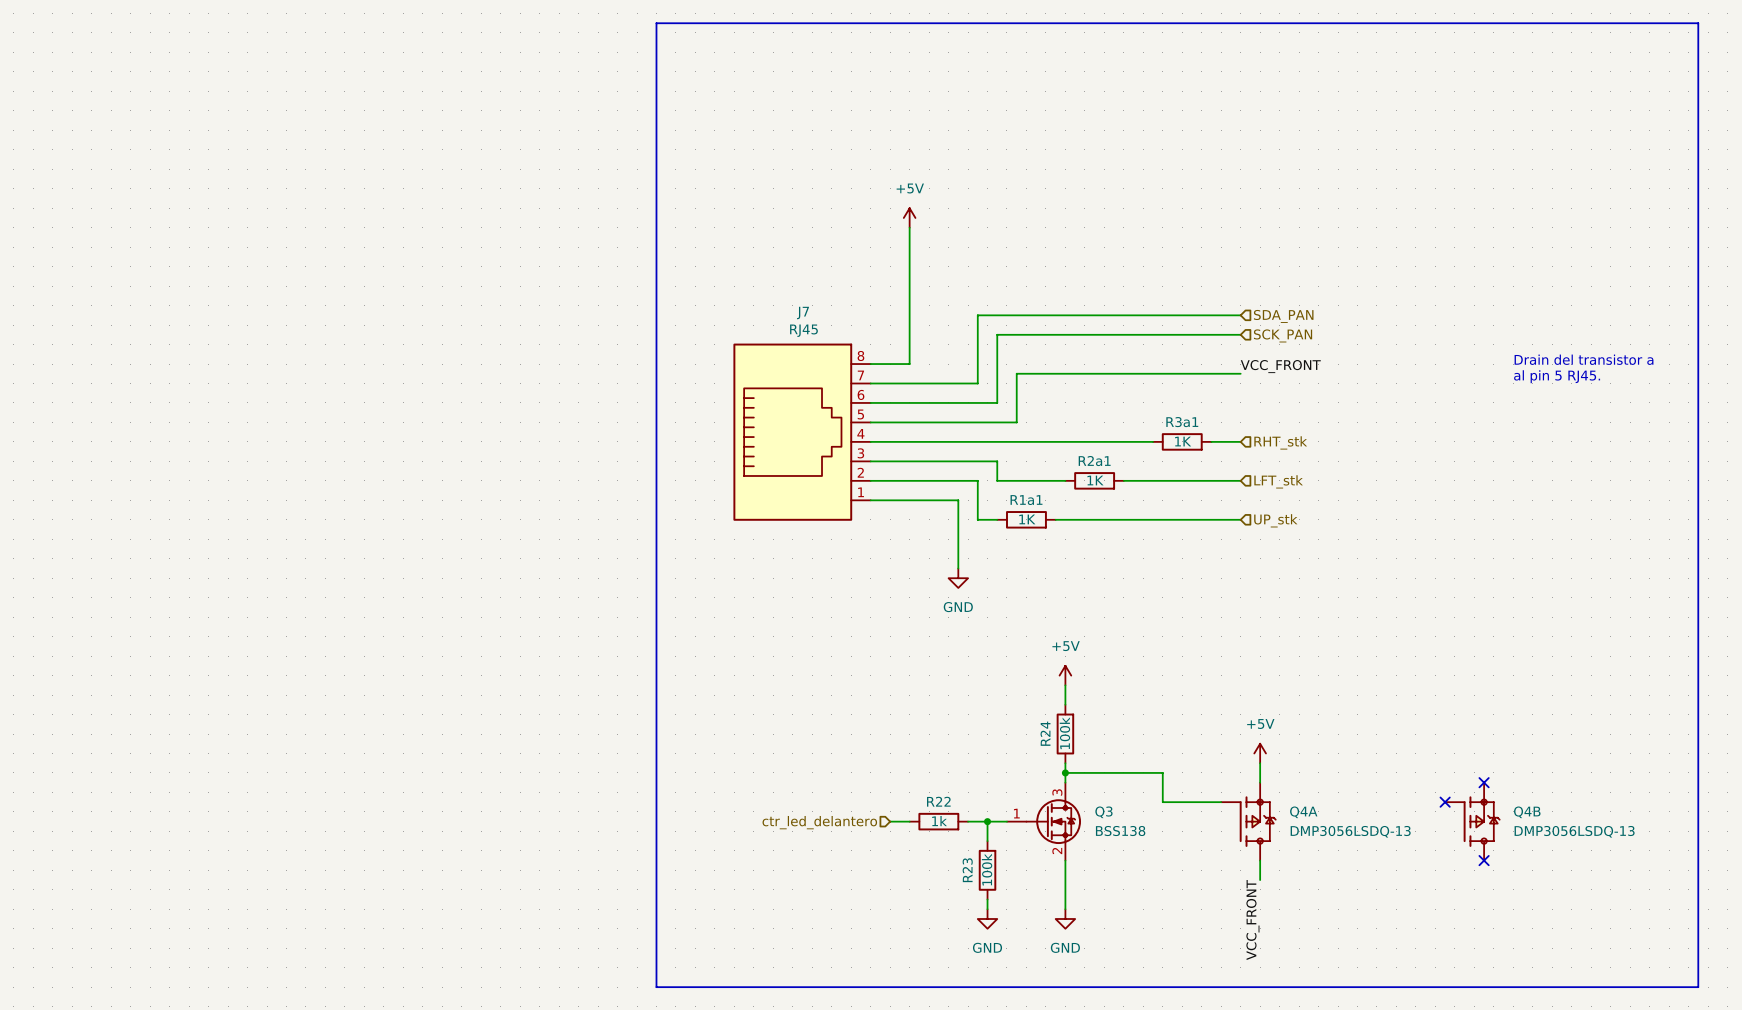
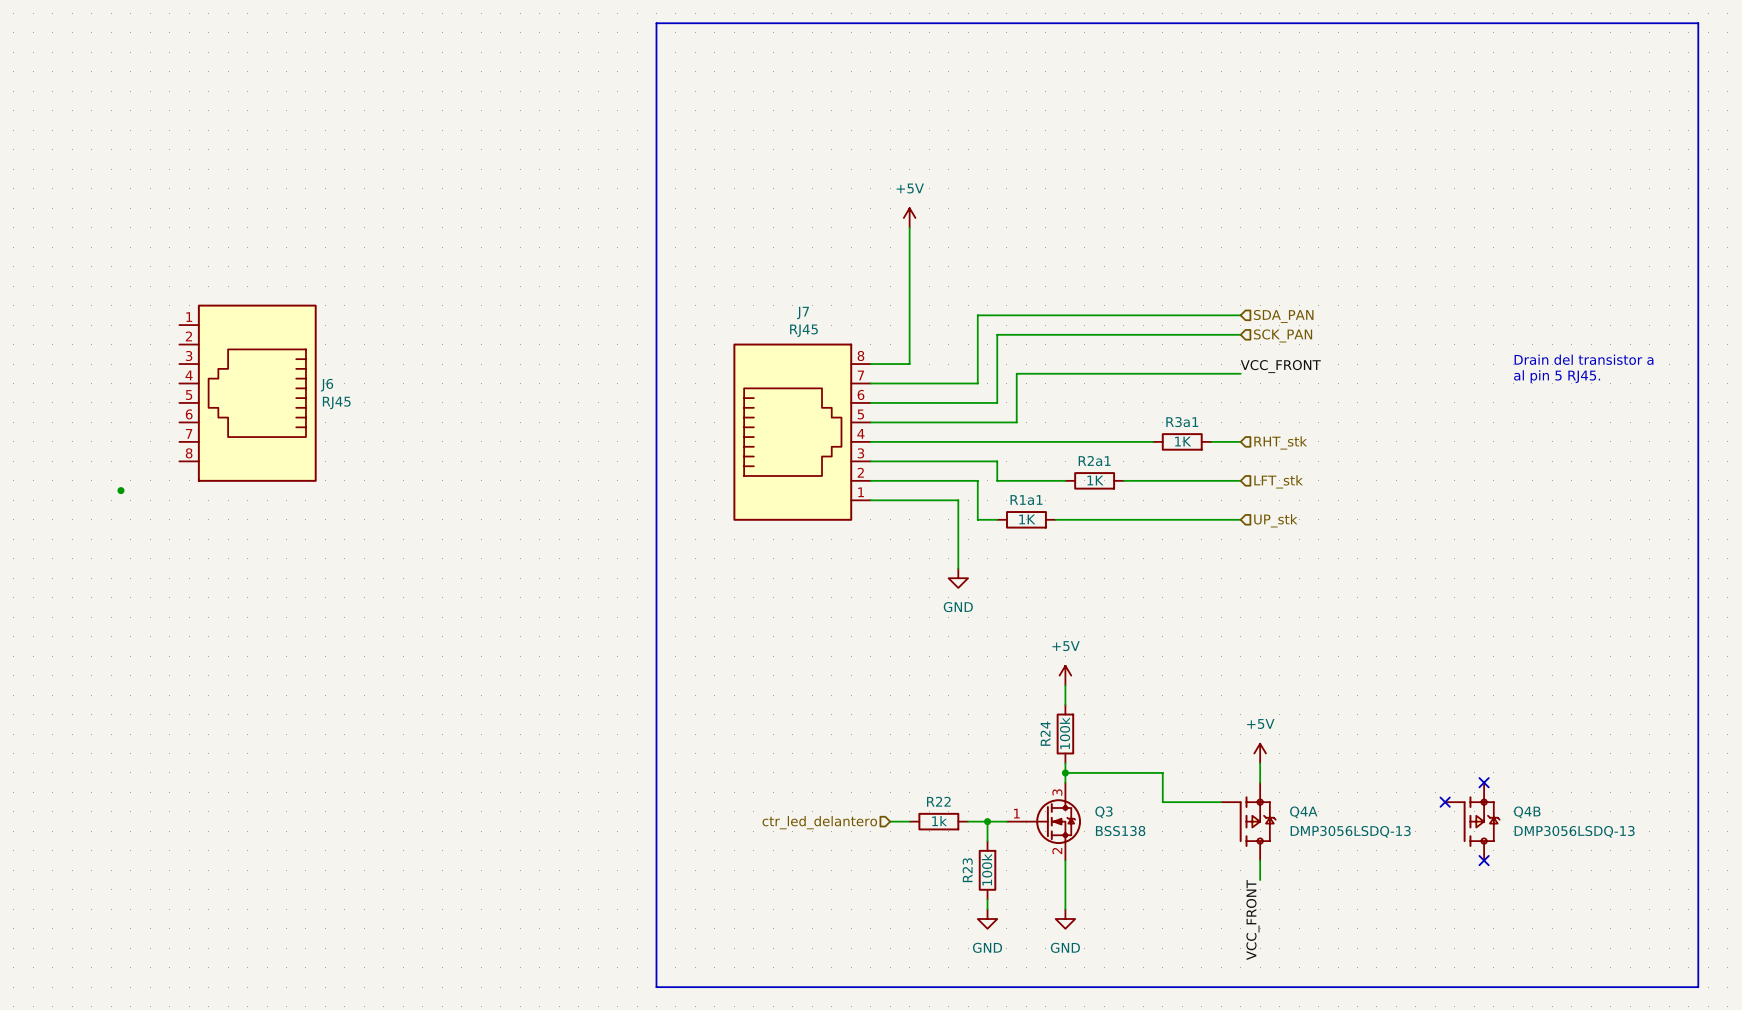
J6: none -> RJ45 (248, 393)
junction: none -> (120, 490)

